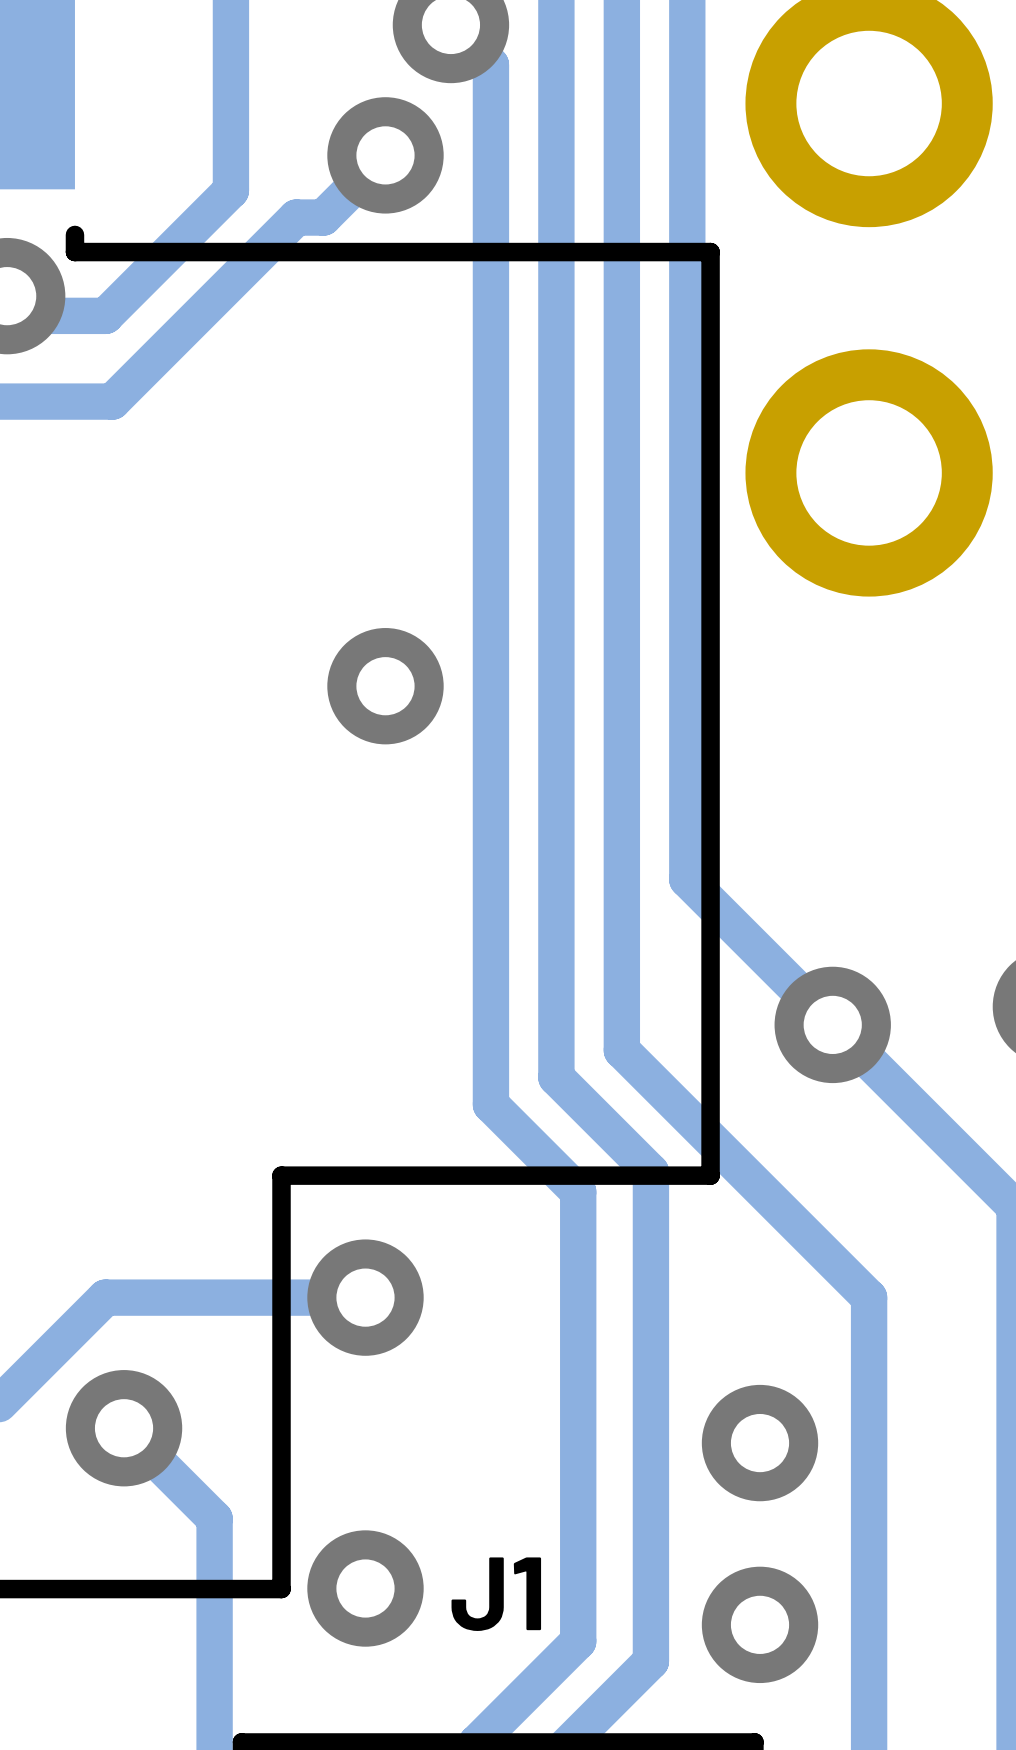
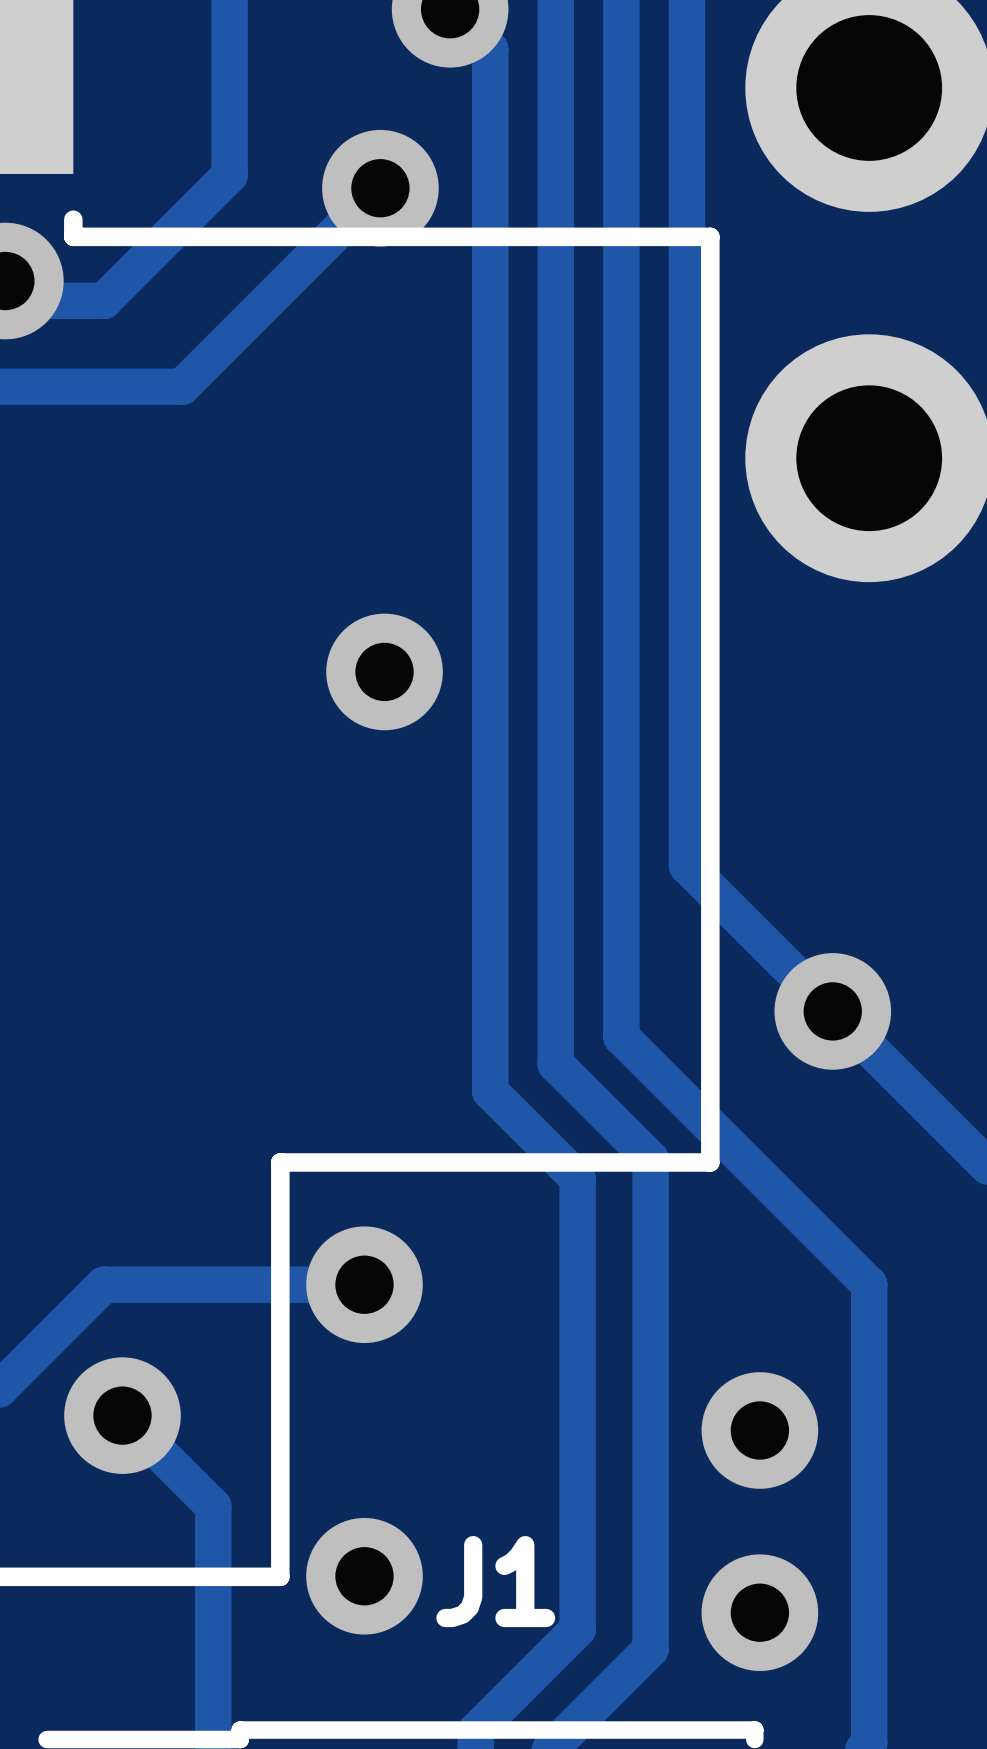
track: (385, 155) (323, 217) (296, 217) (112, 401) -> (380, 188) (181, 386) (110, 386)
via position: (385, 155) -> (380, 188)

